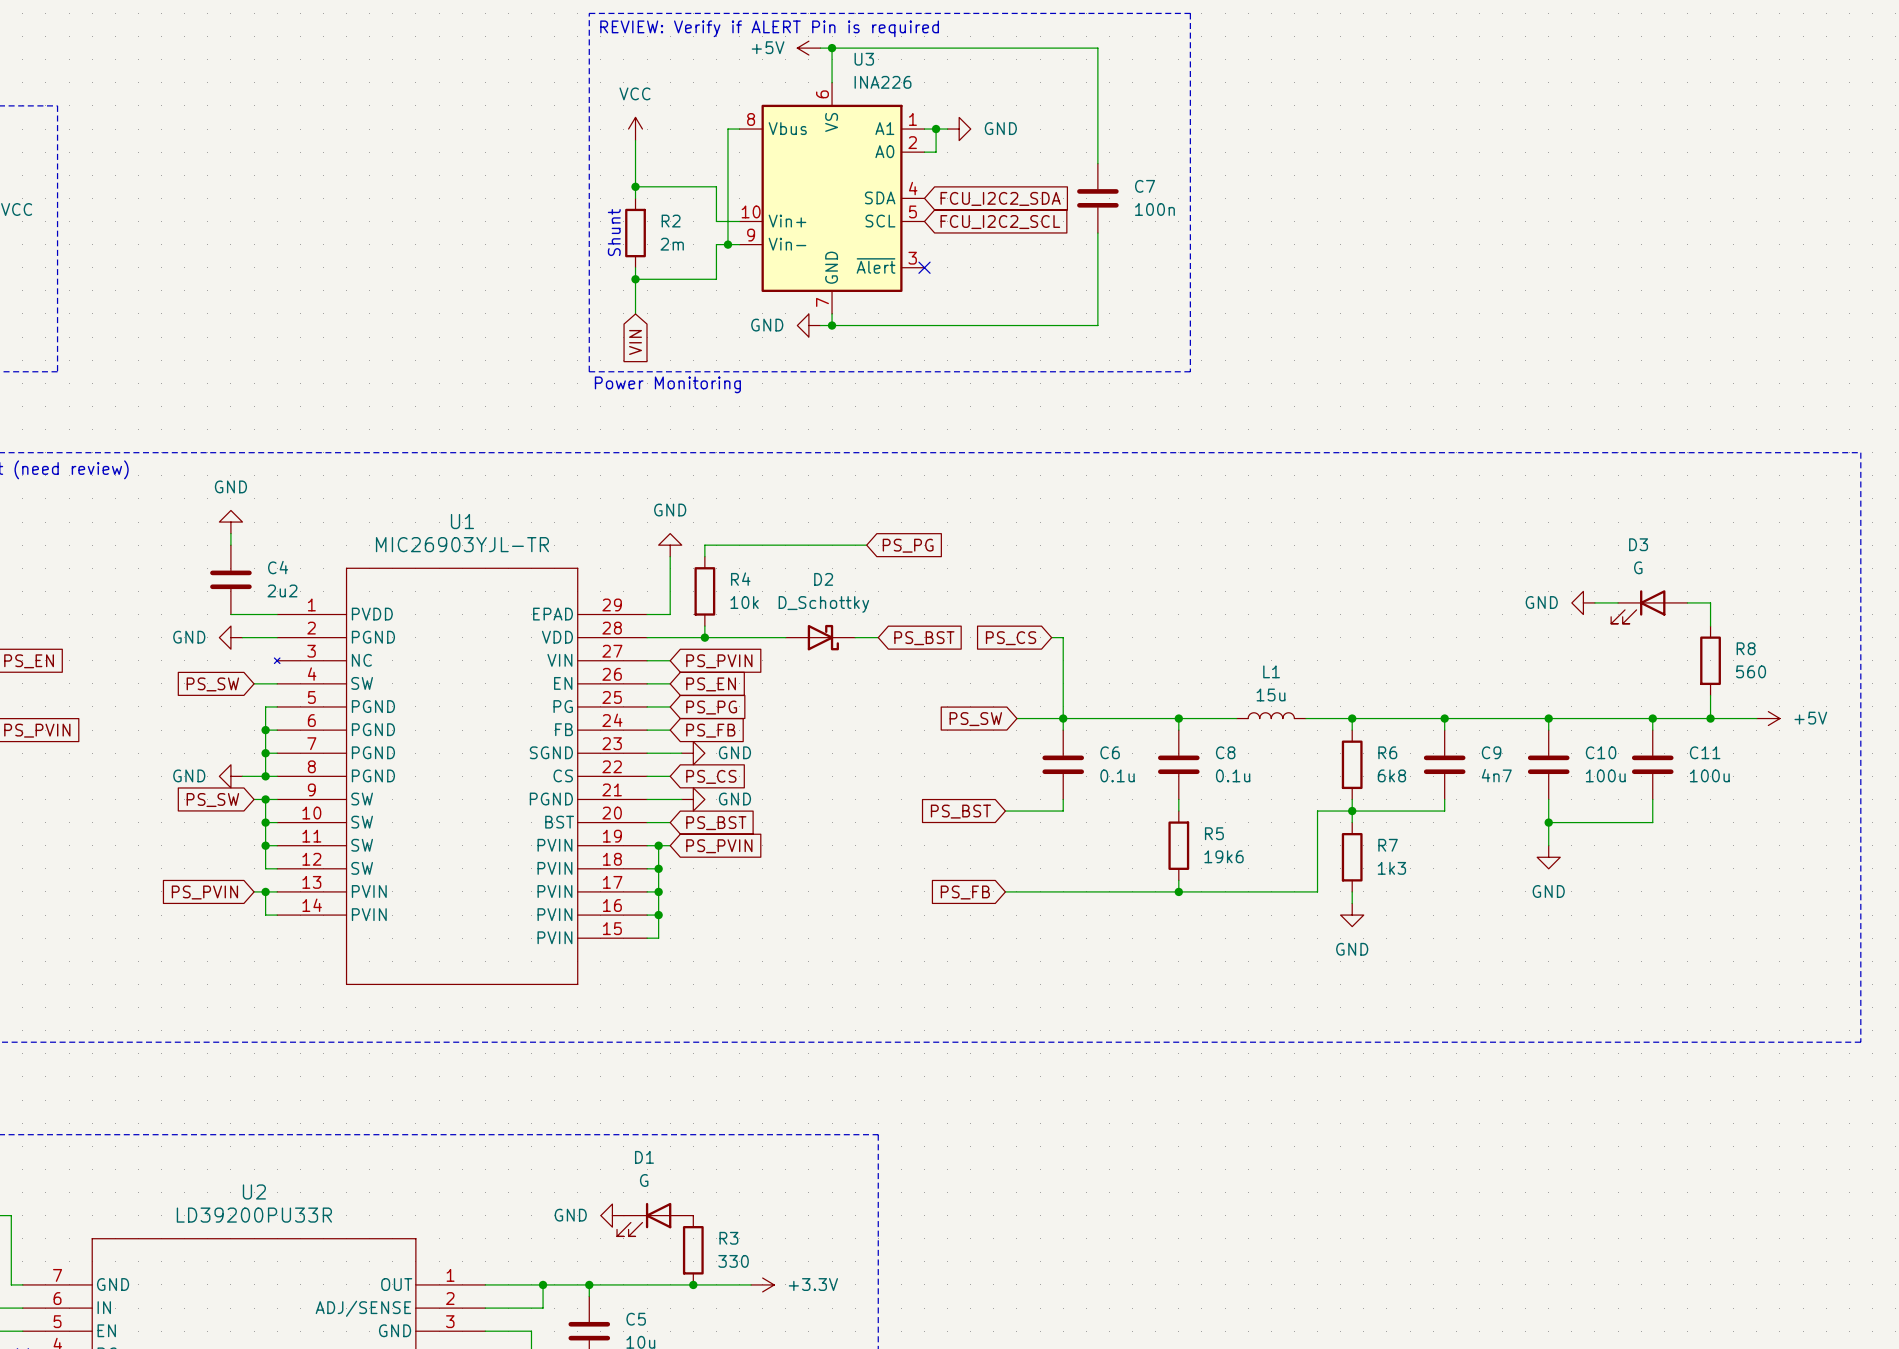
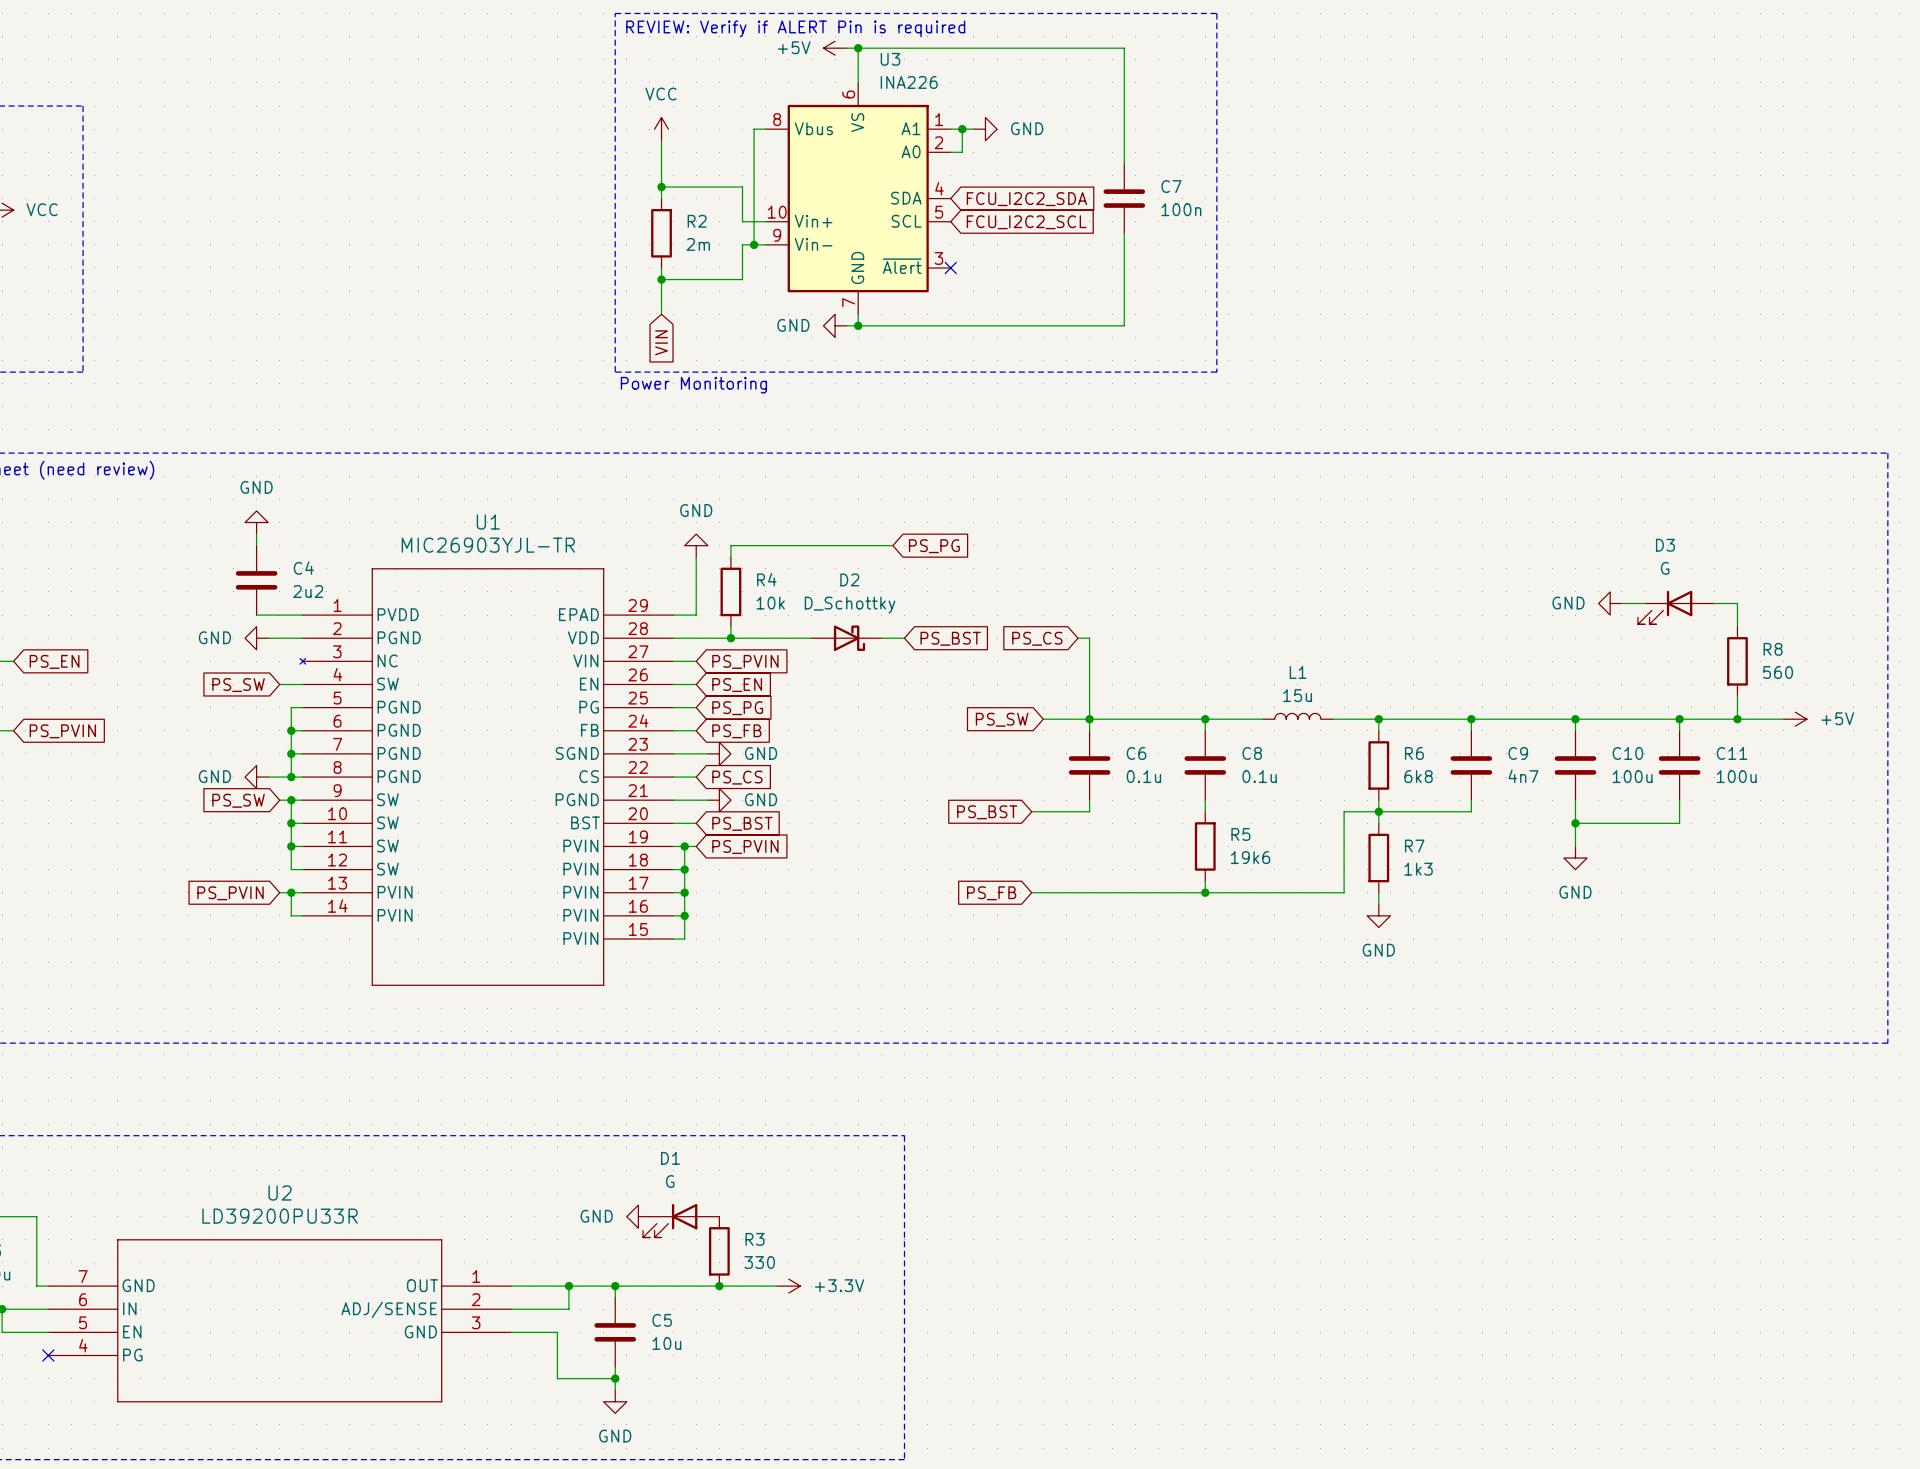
text: Shunt (614, 232) -> none

